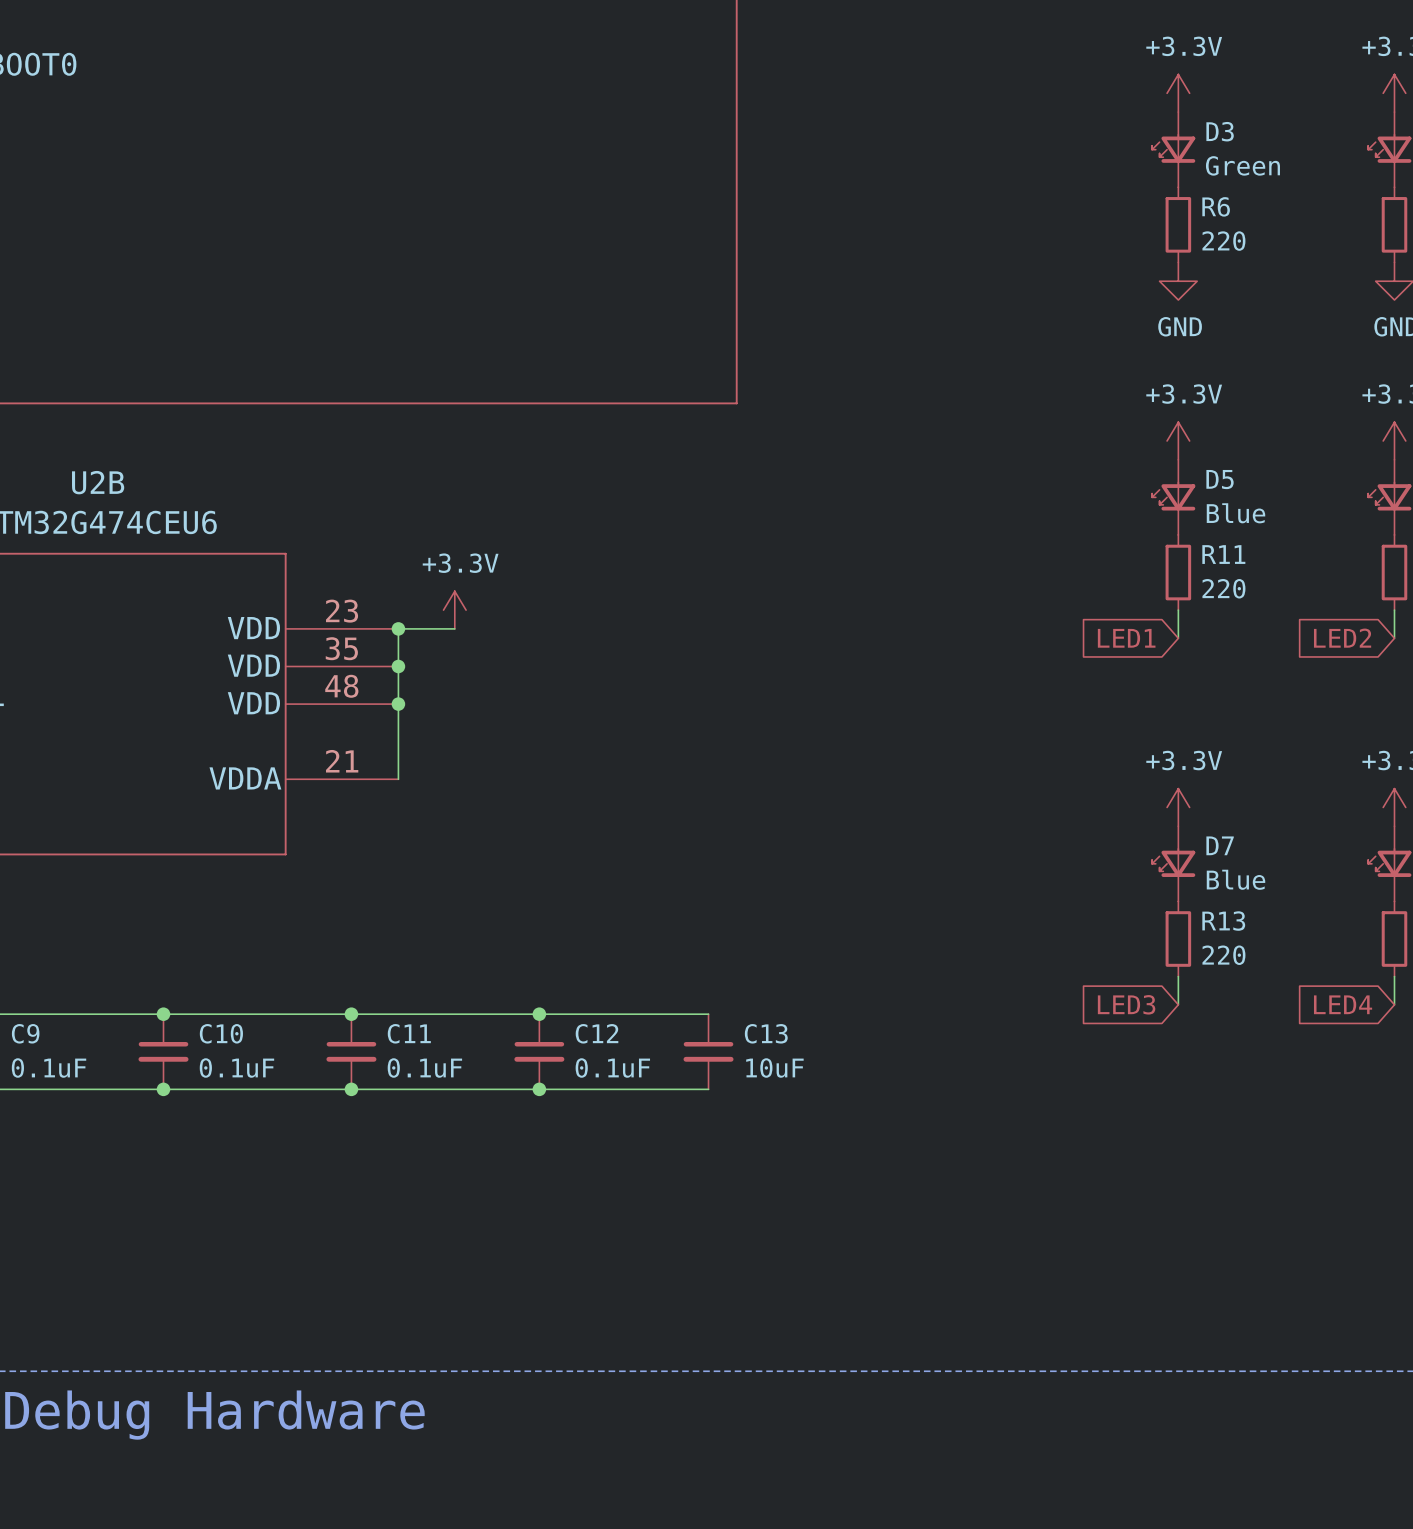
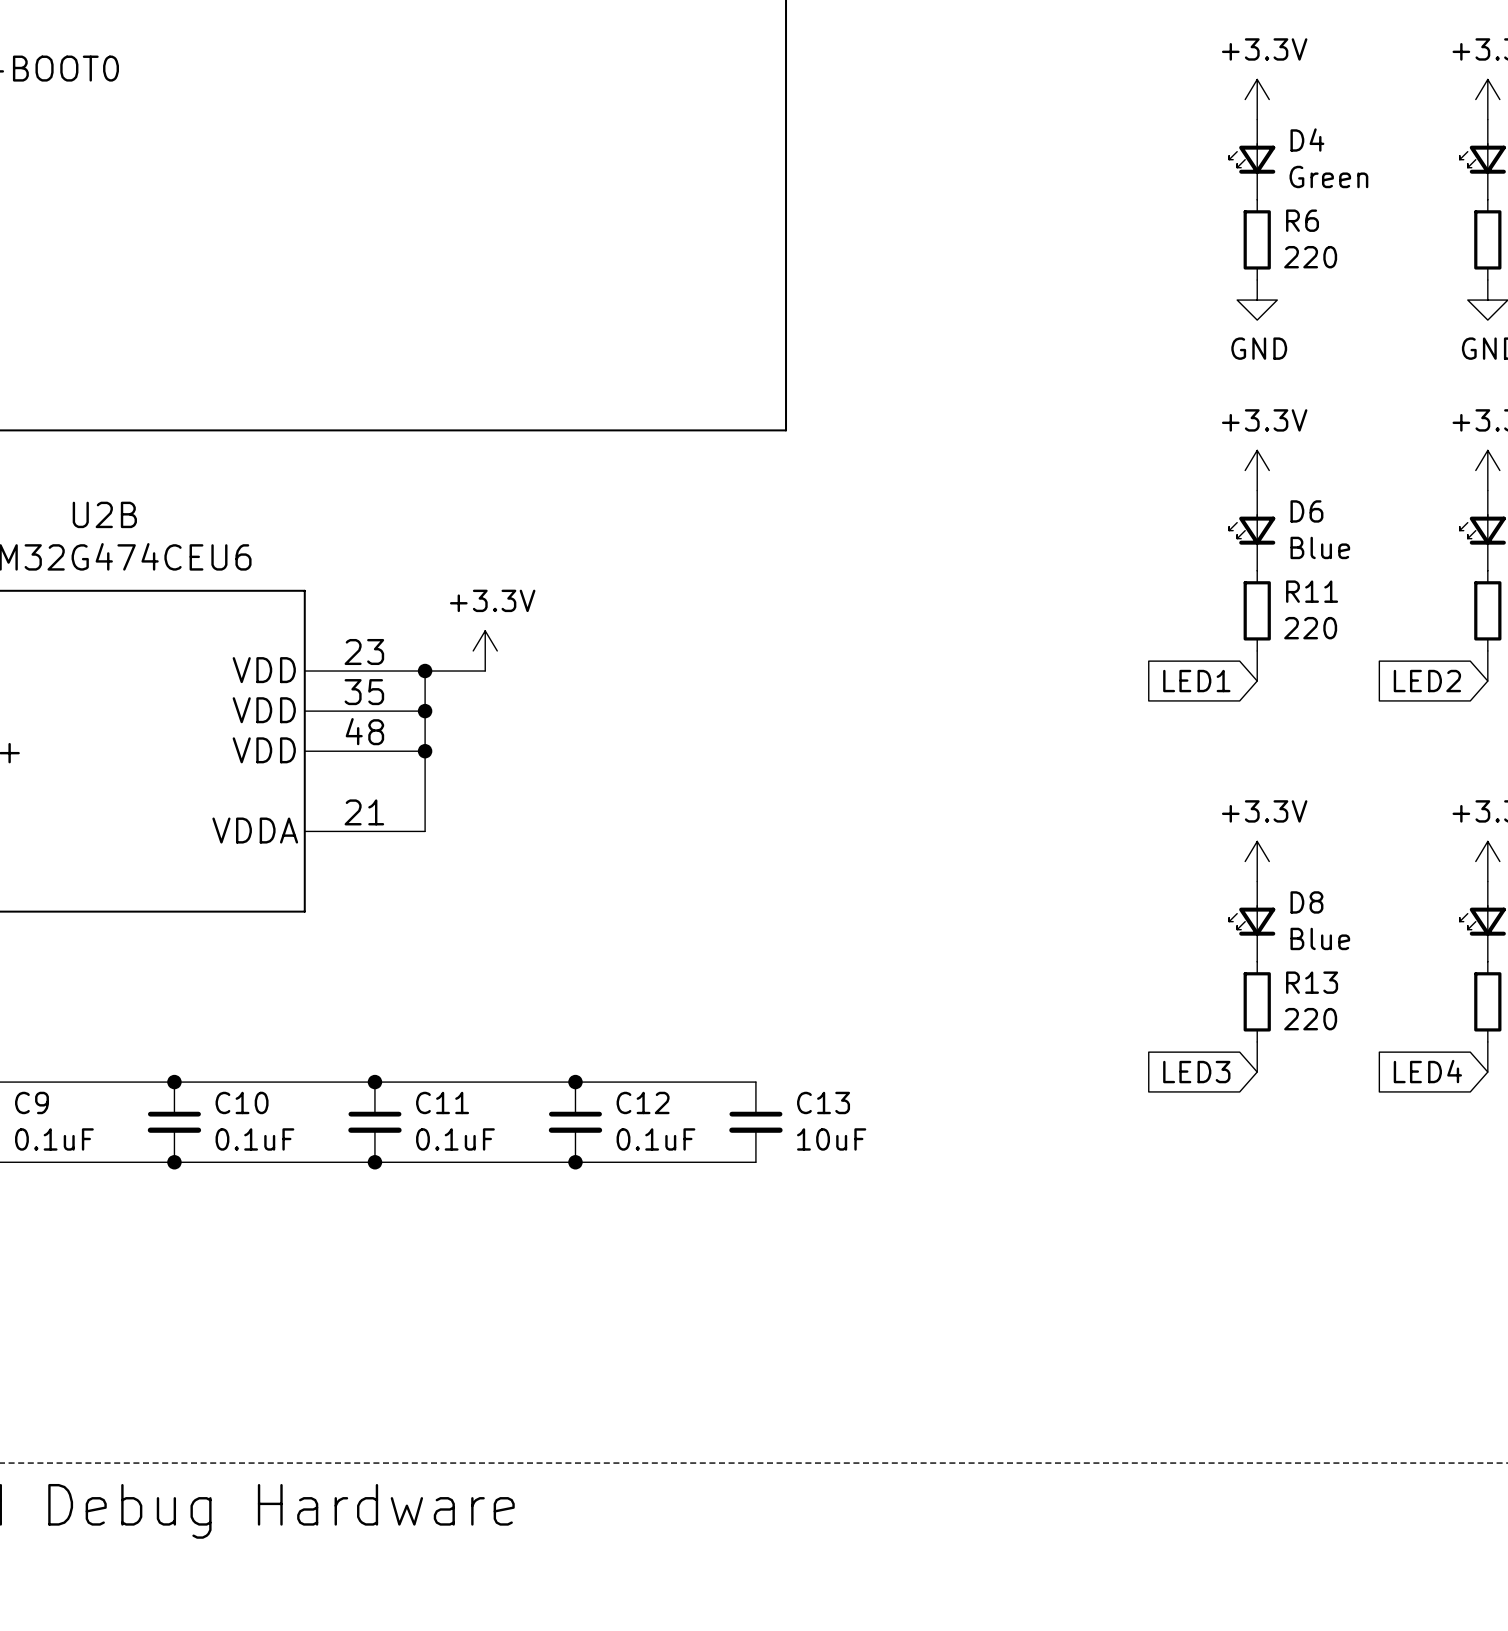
D3 name: D3 (1220, 131) -> D4 (1307, 140)
D5 name: D5 (1220, 479) -> D6 (1306, 511)
D7 name: D7 (1220, 845) -> D8 (1306, 902)

